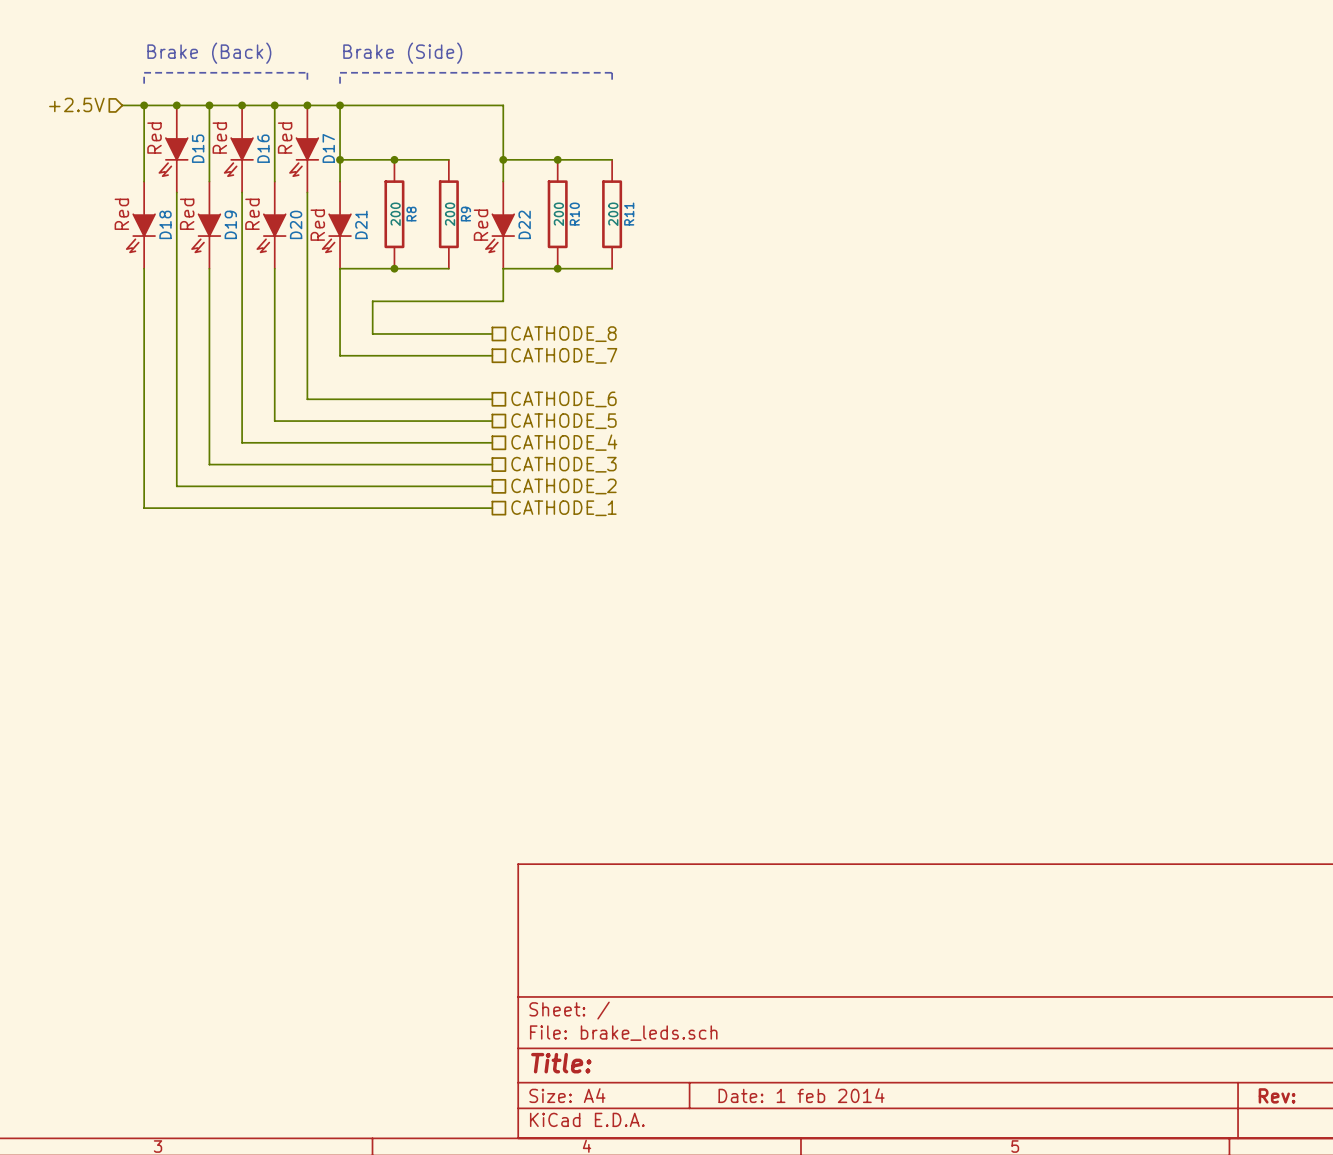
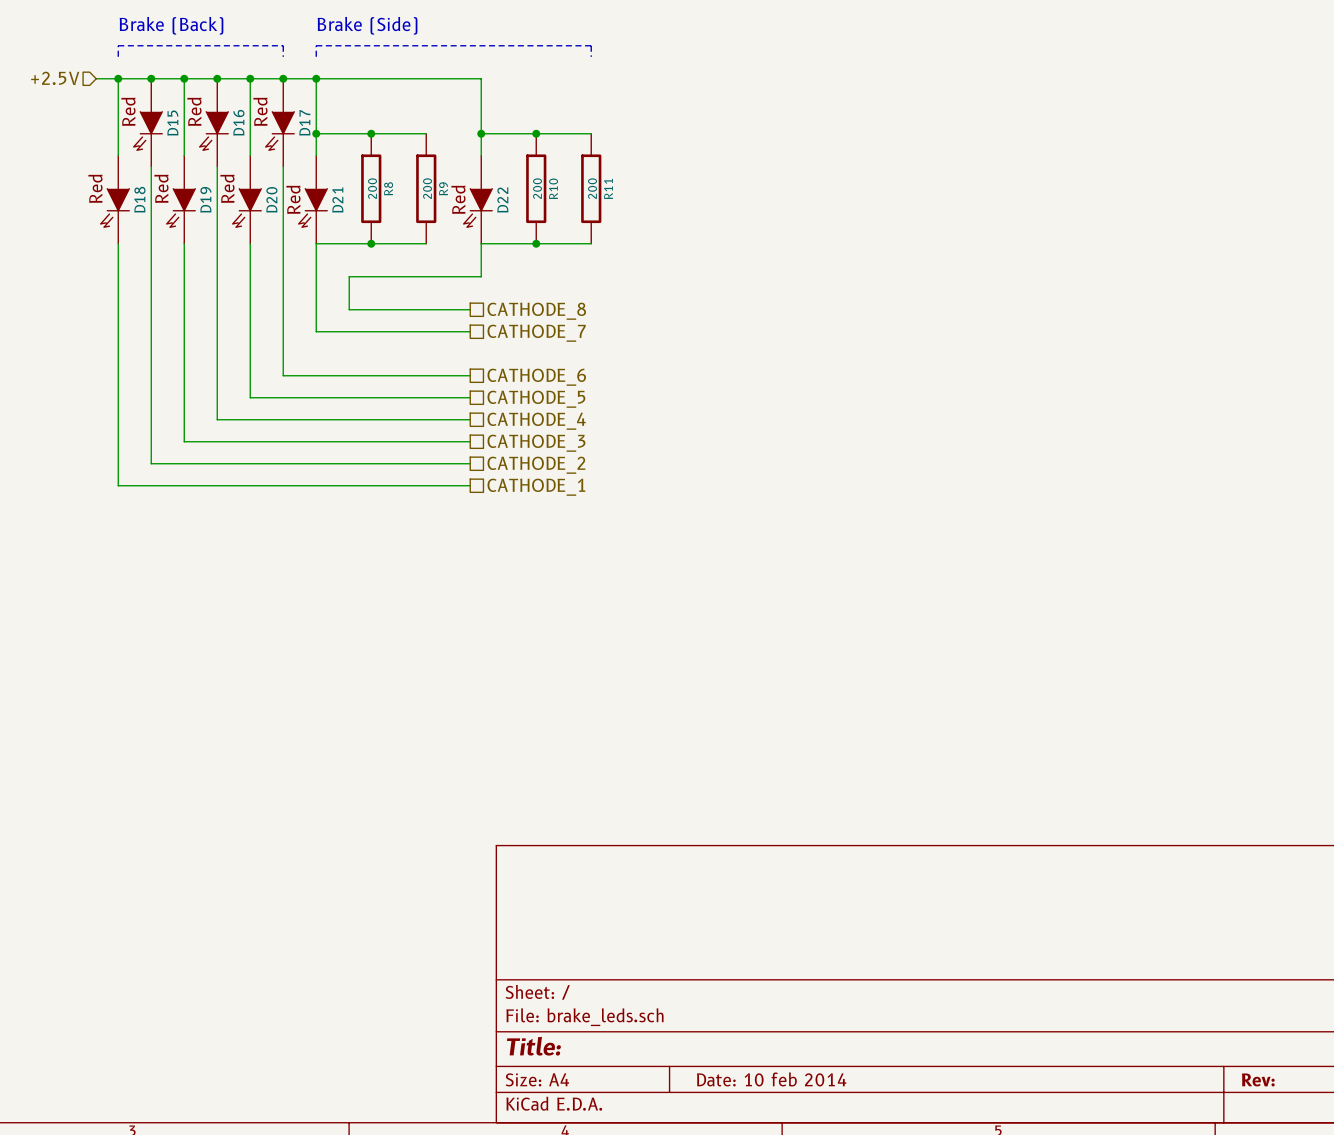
title block: Date: 1 feb 2014 (801, 1095) -> Date: 10 feb 2014 (771, 1079)

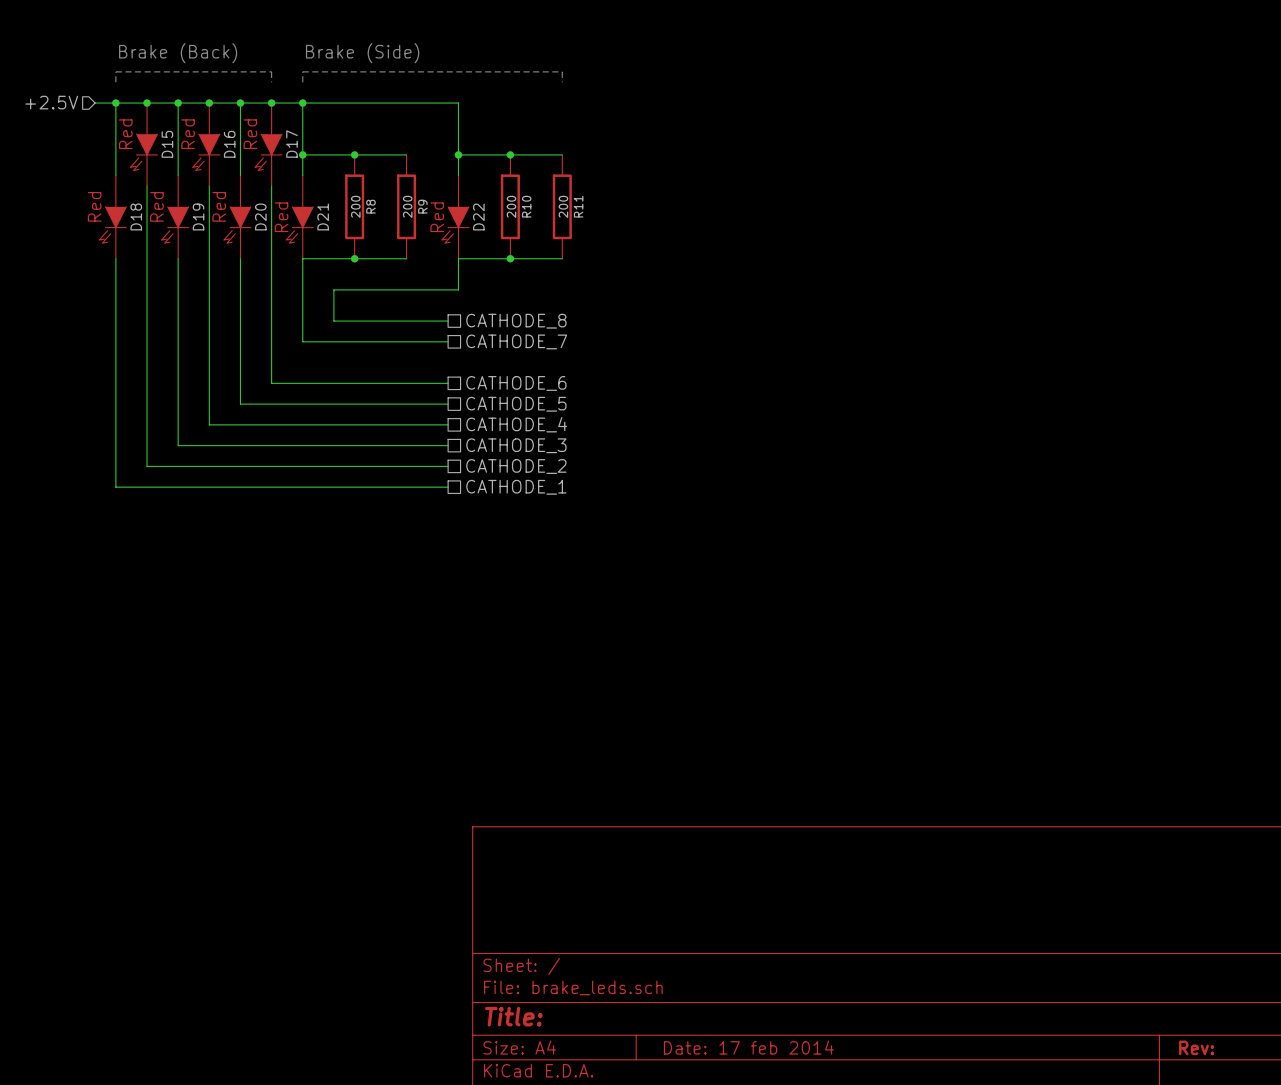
title block: Date: 10 feb 2014 (771, 1079) -> Date: 17 feb 2014 (748, 1047)

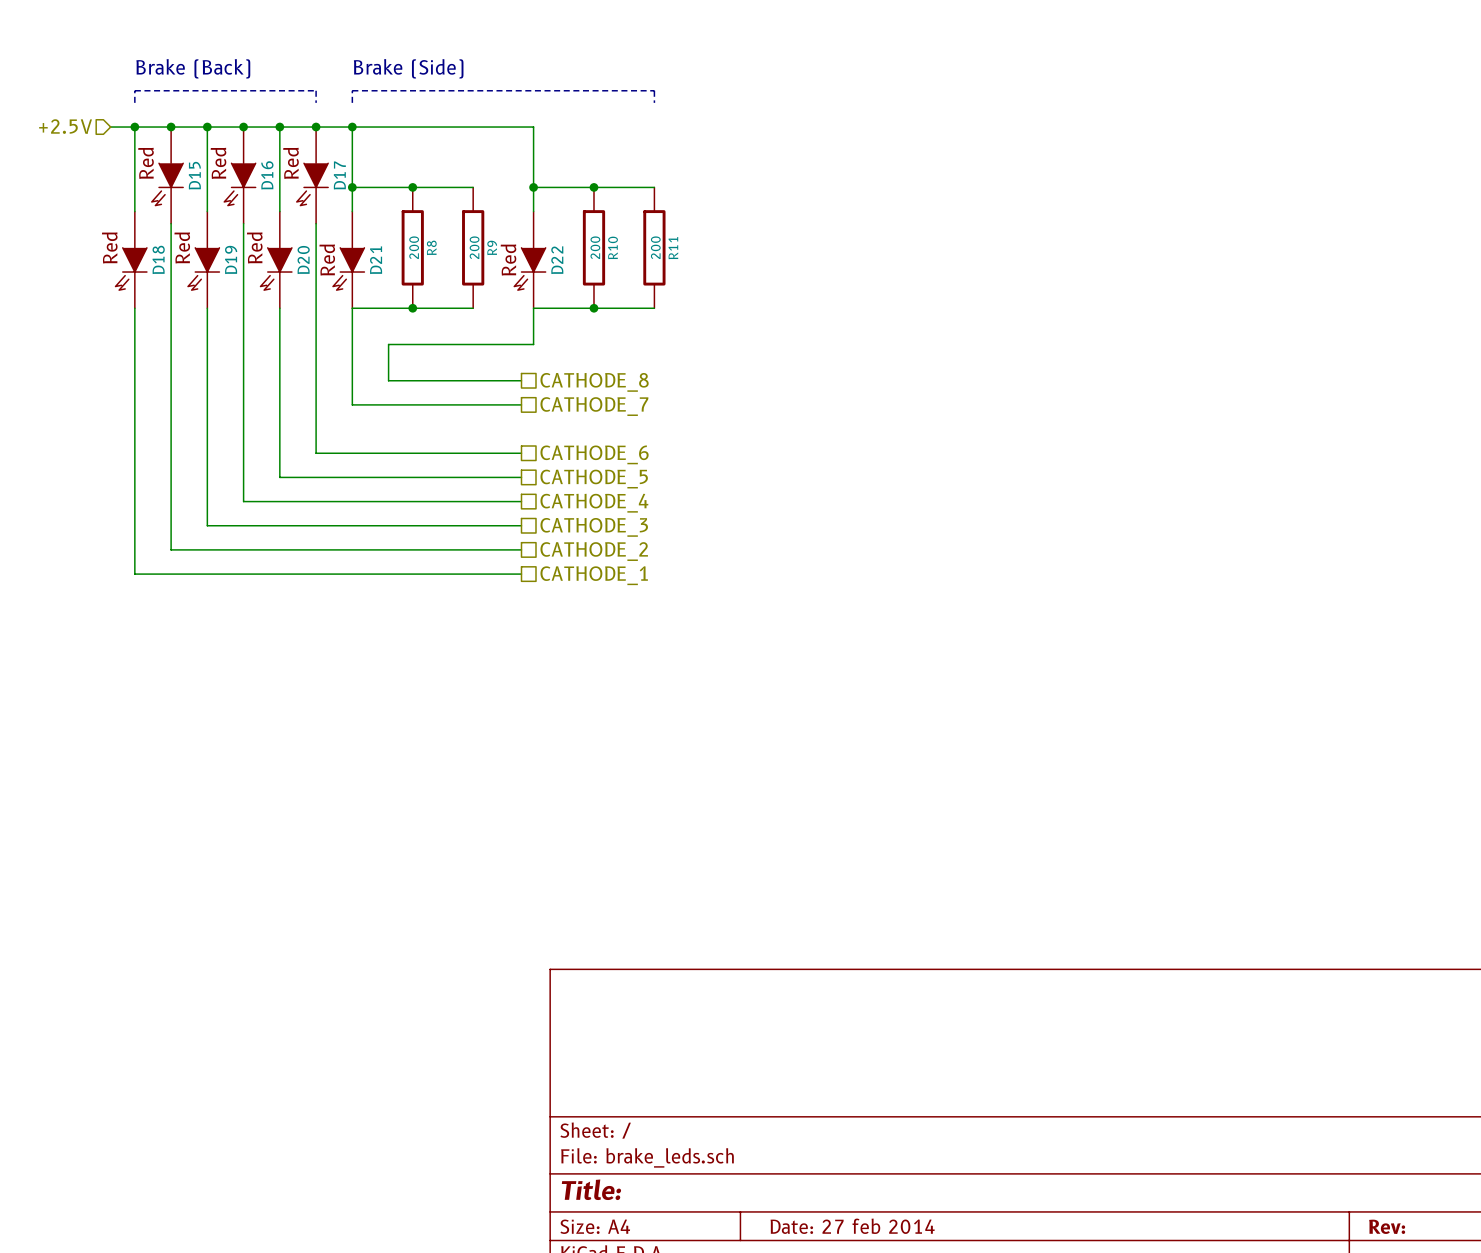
title block: Date: 17 feb 2014 (748, 1047) -> Date: 27 feb 2014 (852, 1226)

